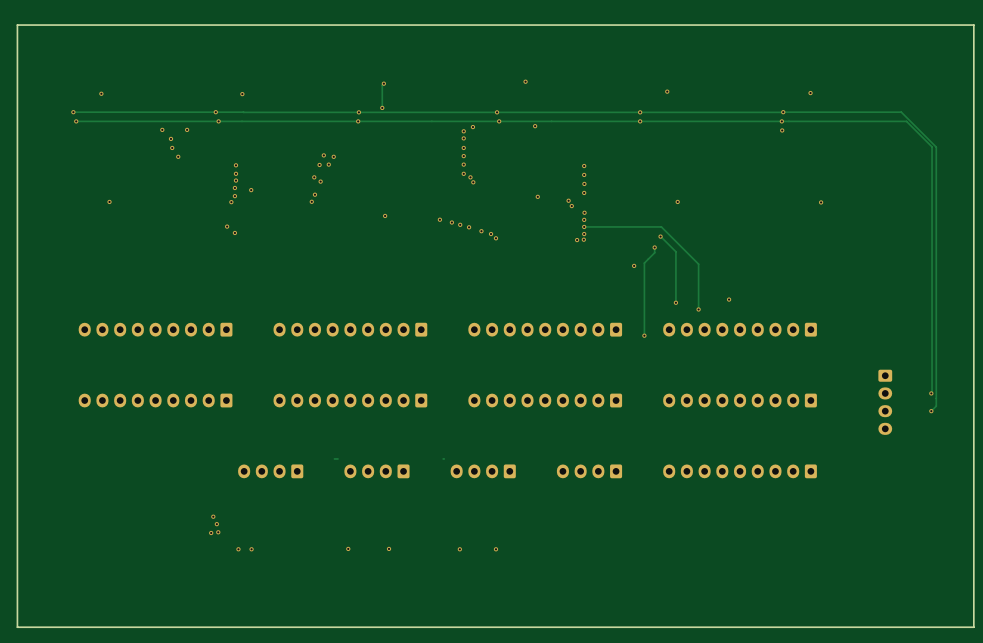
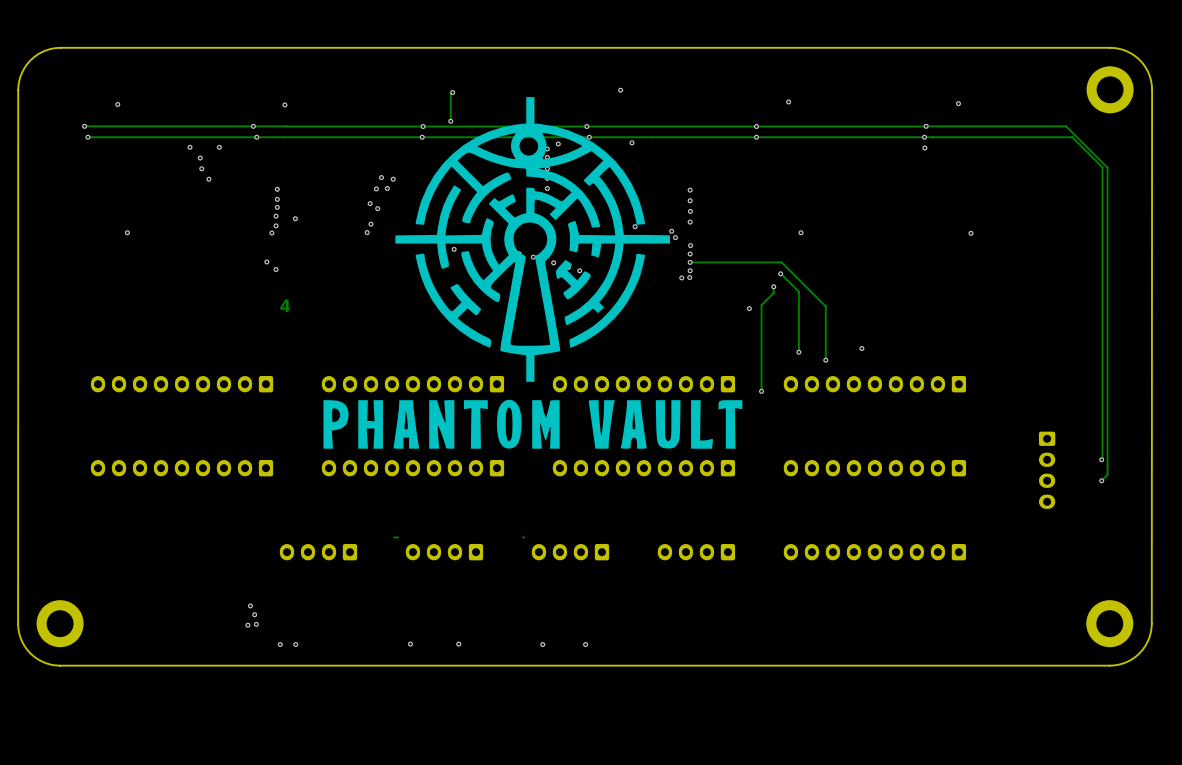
board edge: (973, 25) (17, 25) (17, 627) (973, 627) (973, 25) -> (1110, 47) (1128, 51) (1139, 60) (1147, 71) (1152, 89) (1151, 623) (1149, 637) (1145, 646) (1139, 653) (1128, 661) (1109, 665) (60, 665) (46, 663) (37, 659) (30, 653) (22, 641) (18, 623) (18, 90) (19, 80) (24, 67) (34, 57) (42, 52) (60, 47) (1110, 47)
part: none -> (1110, 89)
drawing: none -> [323, 97, 743, 449]
text: none -> 4 (285, 305)
part: none -> (60, 623)
part: none -> (1109, 623)

